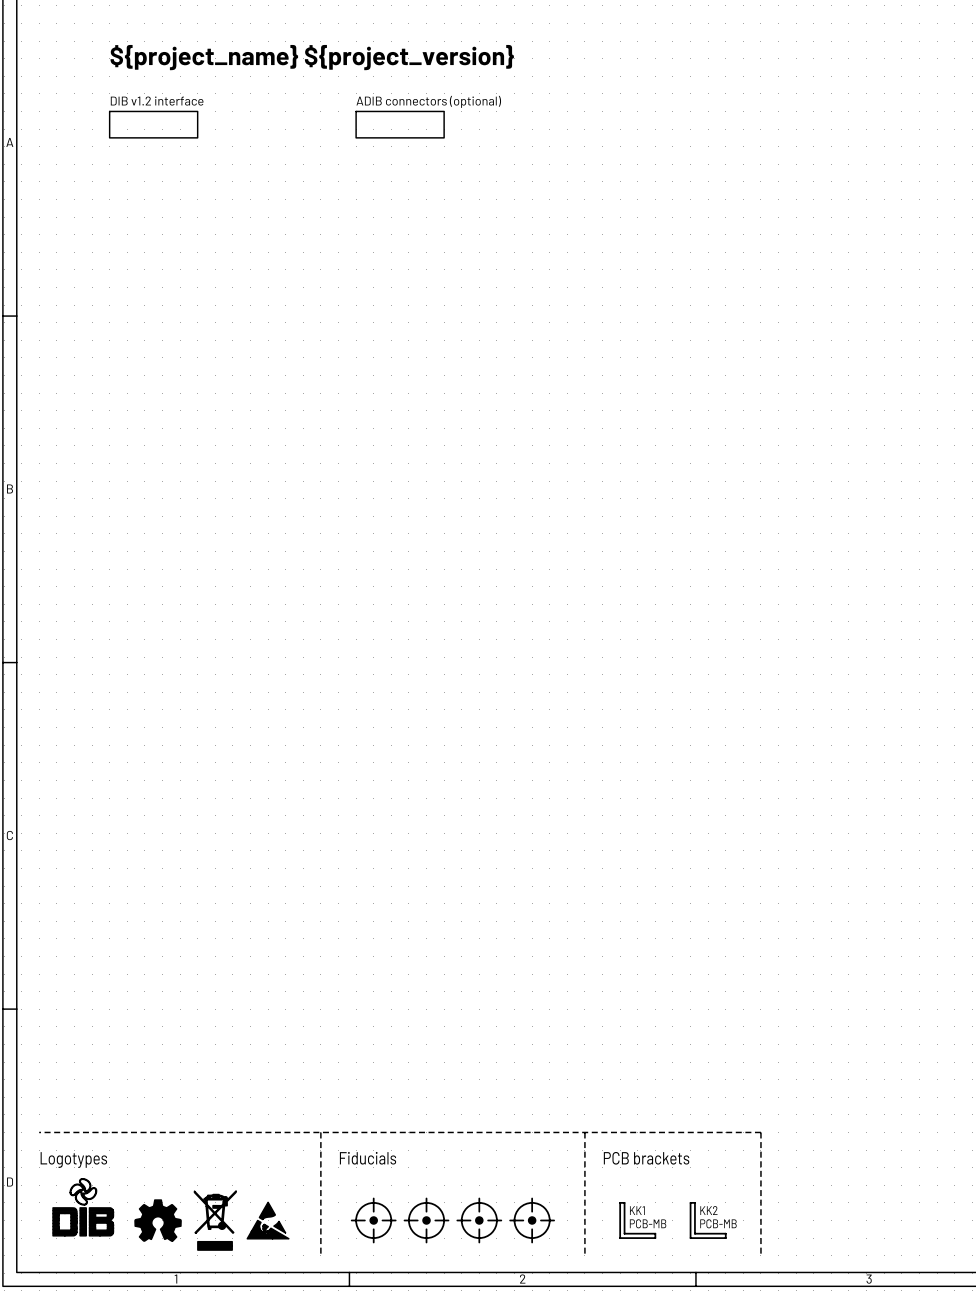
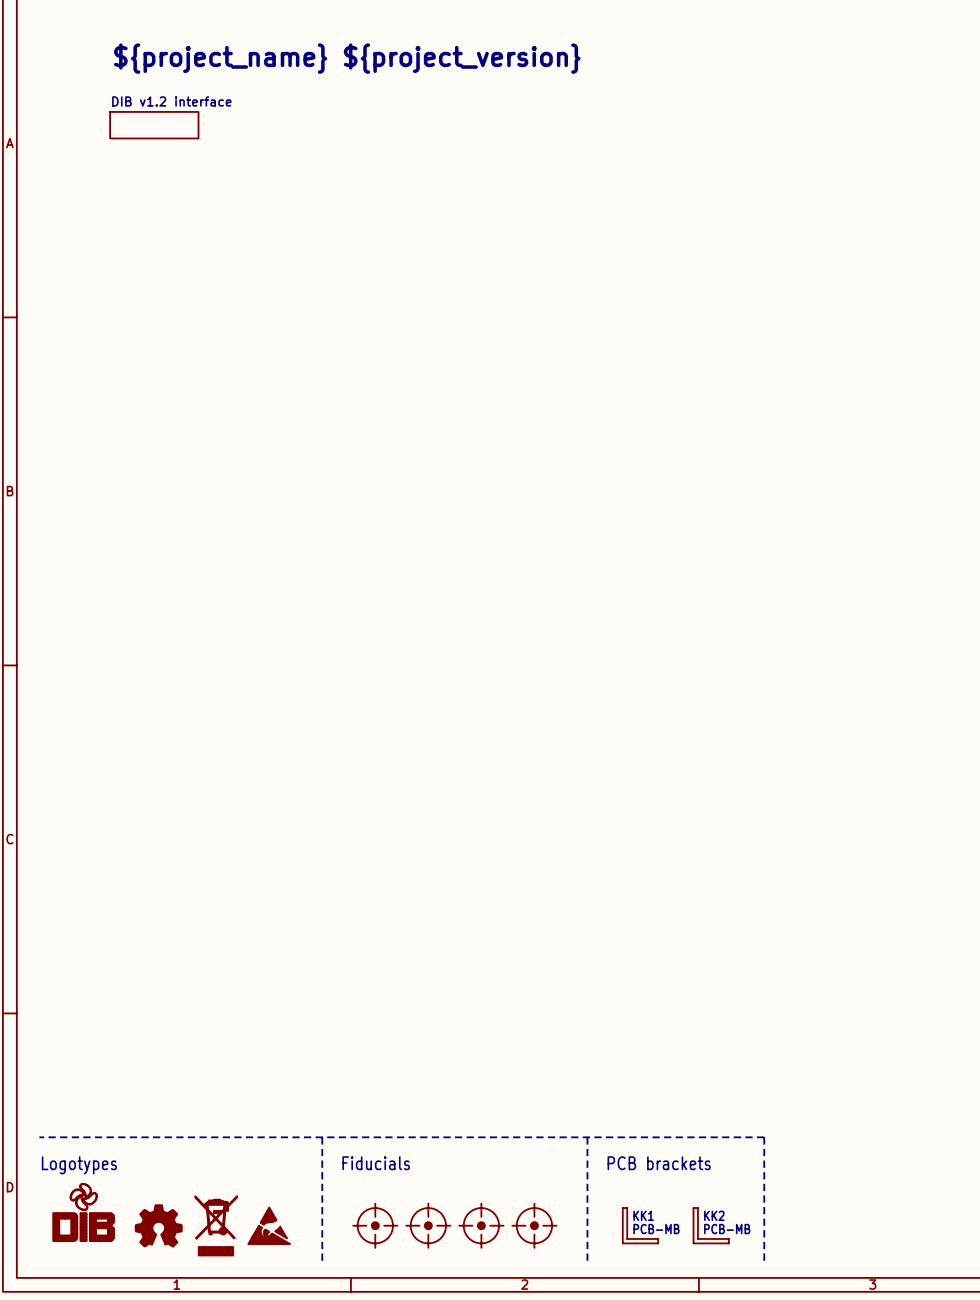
sheet ADIB connectors (optional): (400, 124) -> none

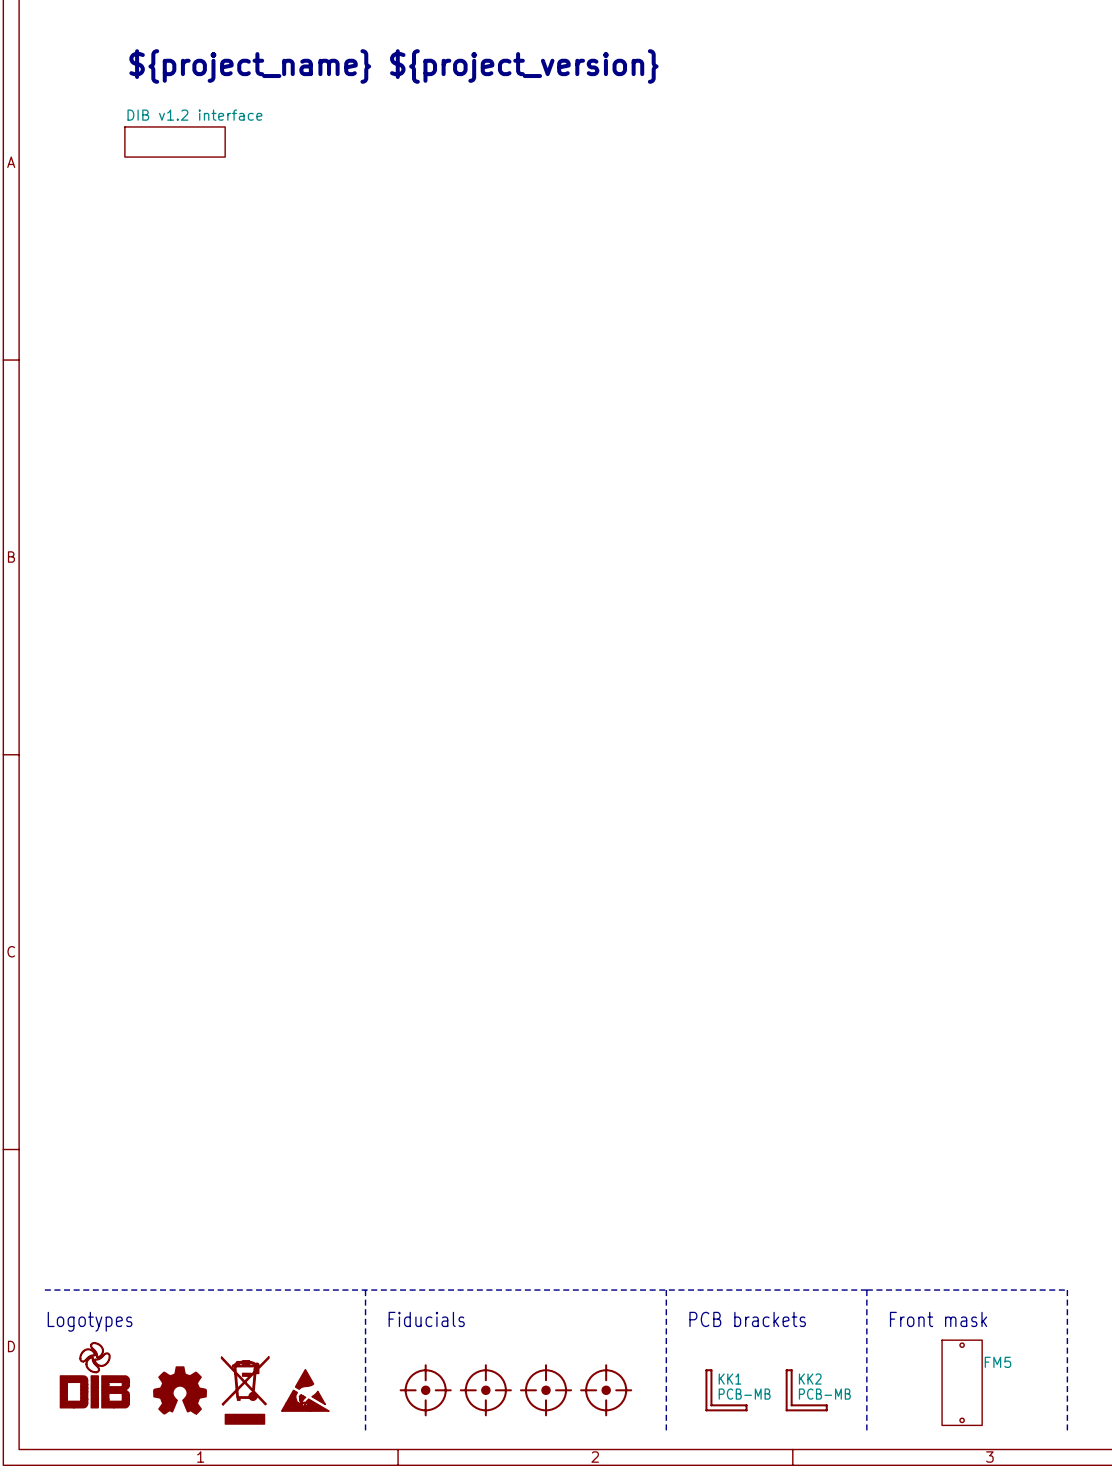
line: none -> (866, 1290) (1067, 1290) (1067, 1430)
text: none -> Front mask (938, 1319)
FM5: none -> (962, 1382)

